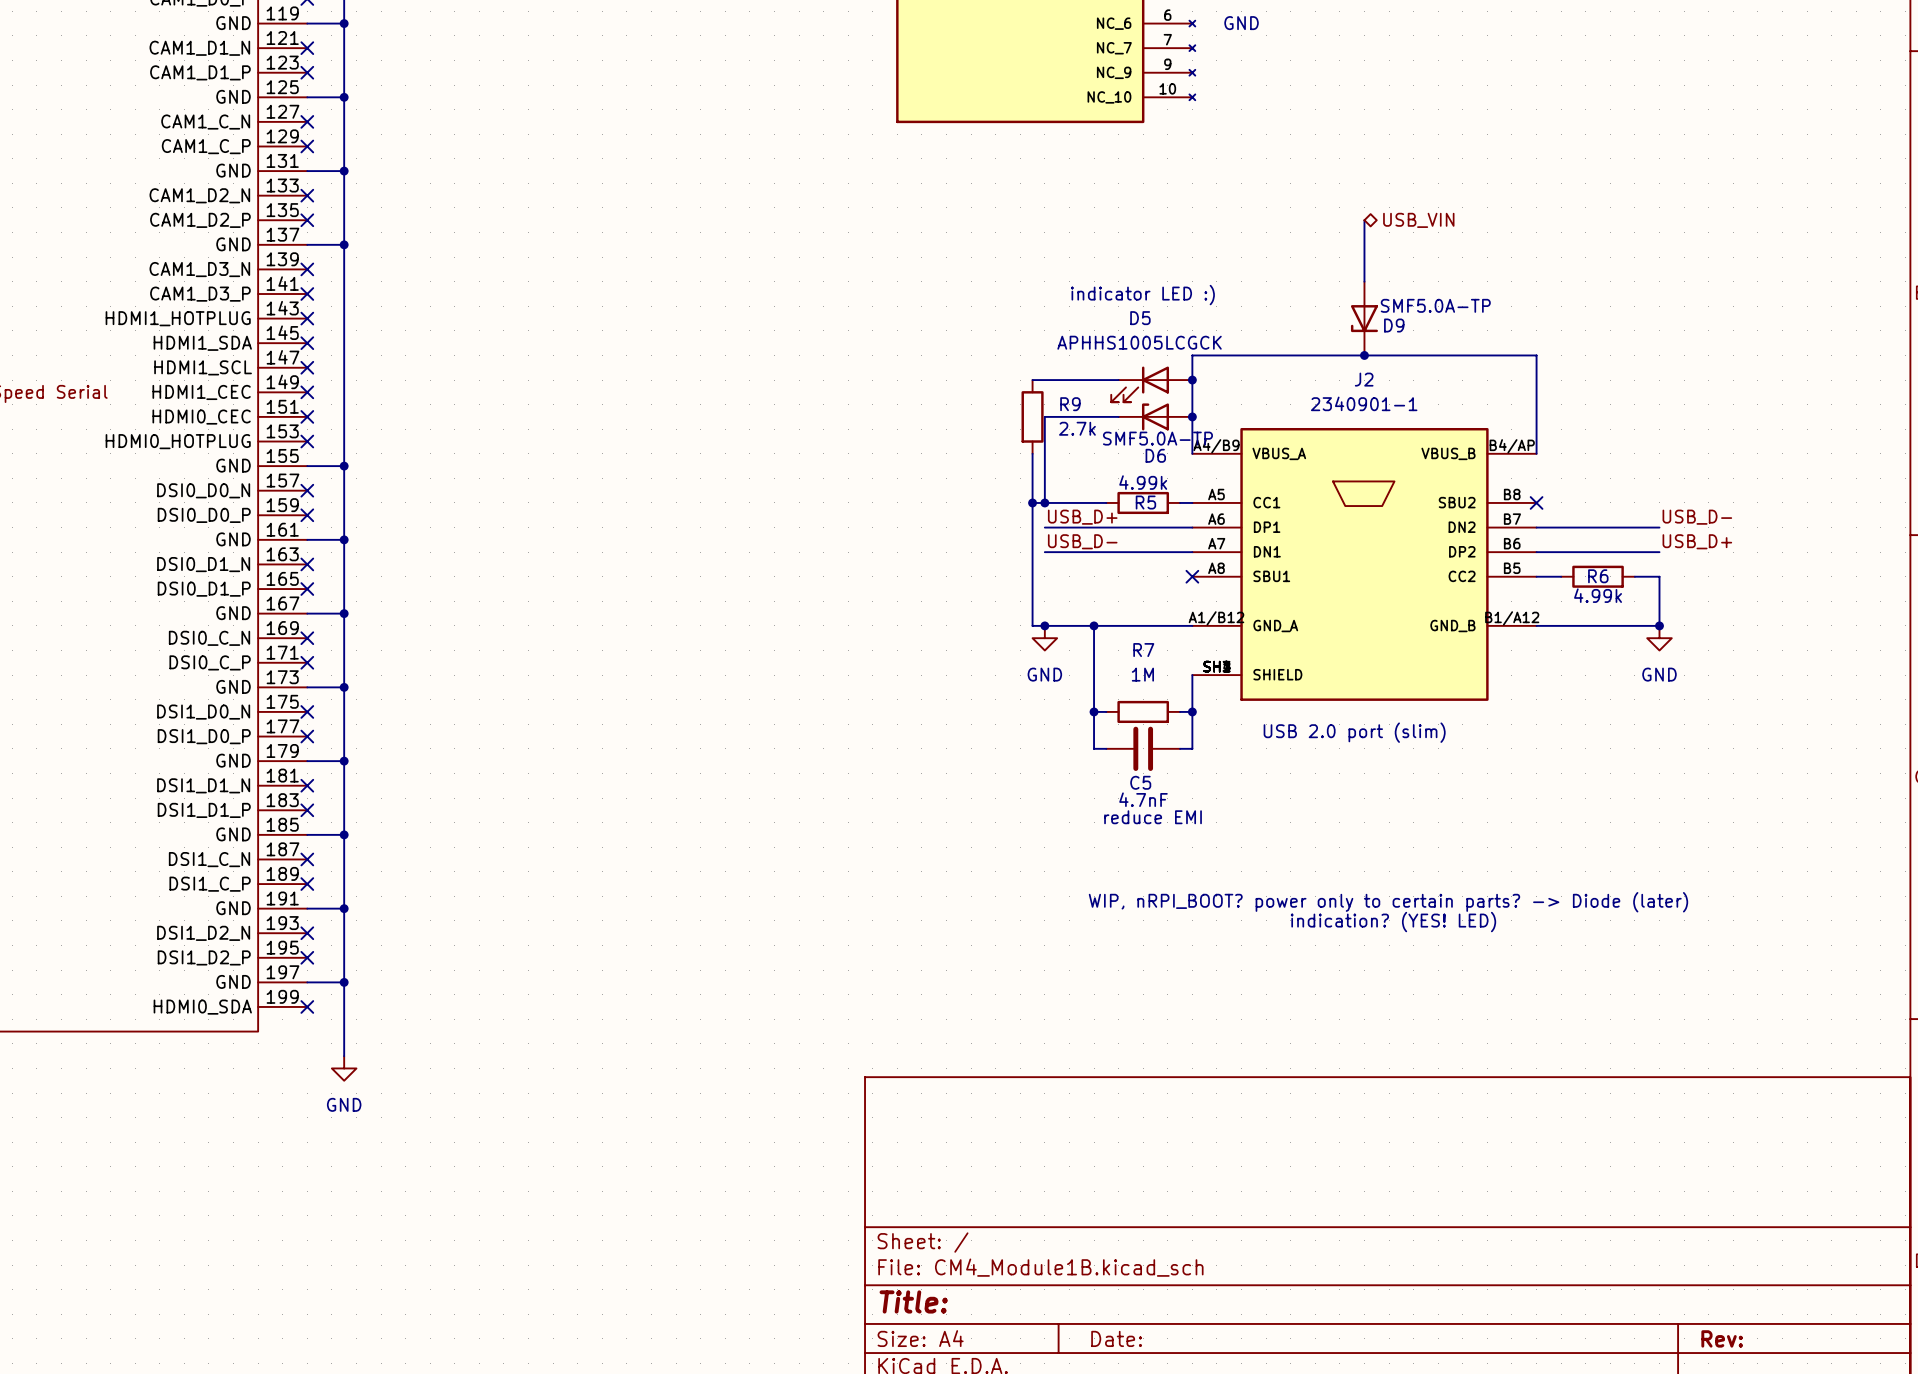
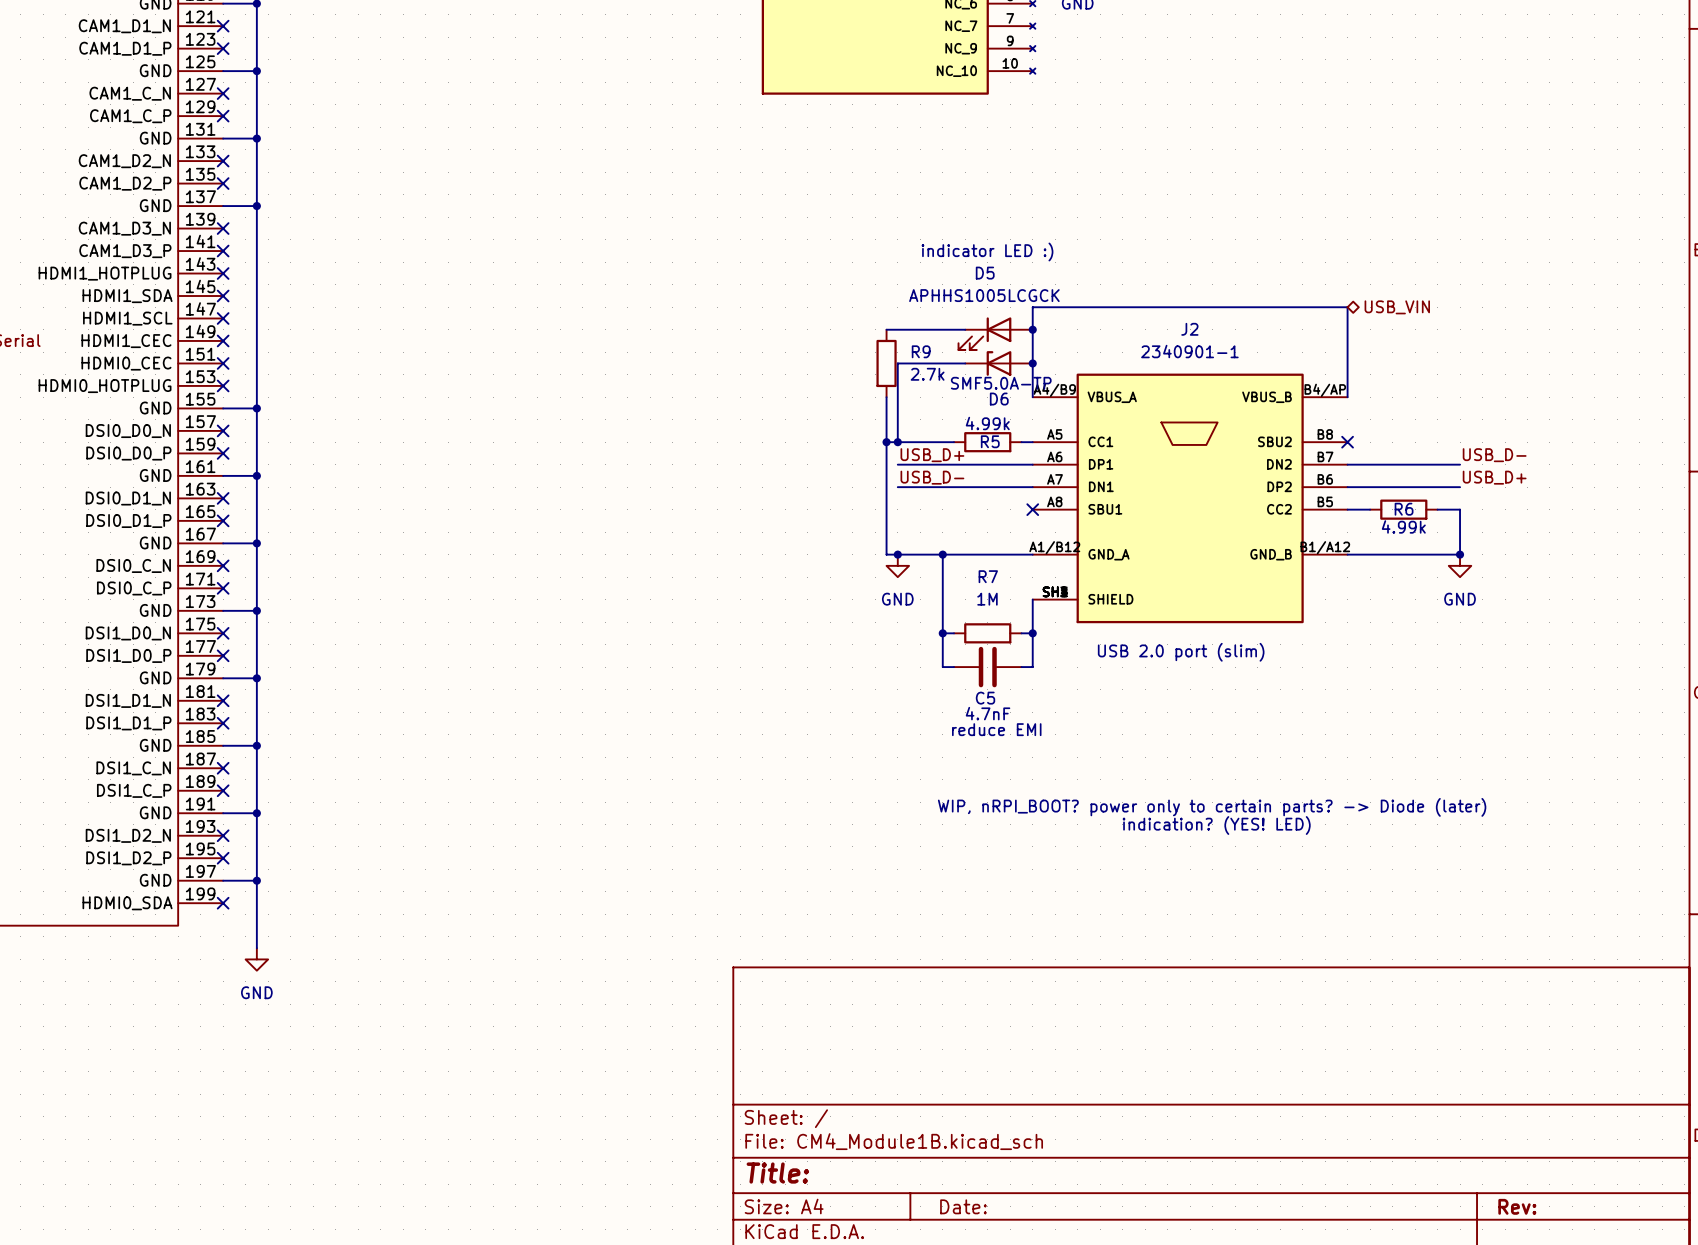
wire: (1364, 220) (1364, 281) -> none
hierarchical label position: USB_VIN (1418, 220) -> USB_VIN (1397, 307)
D9: SMF5.0A-TP (1364, 318) -> none
junction: (1364, 355) -> none

